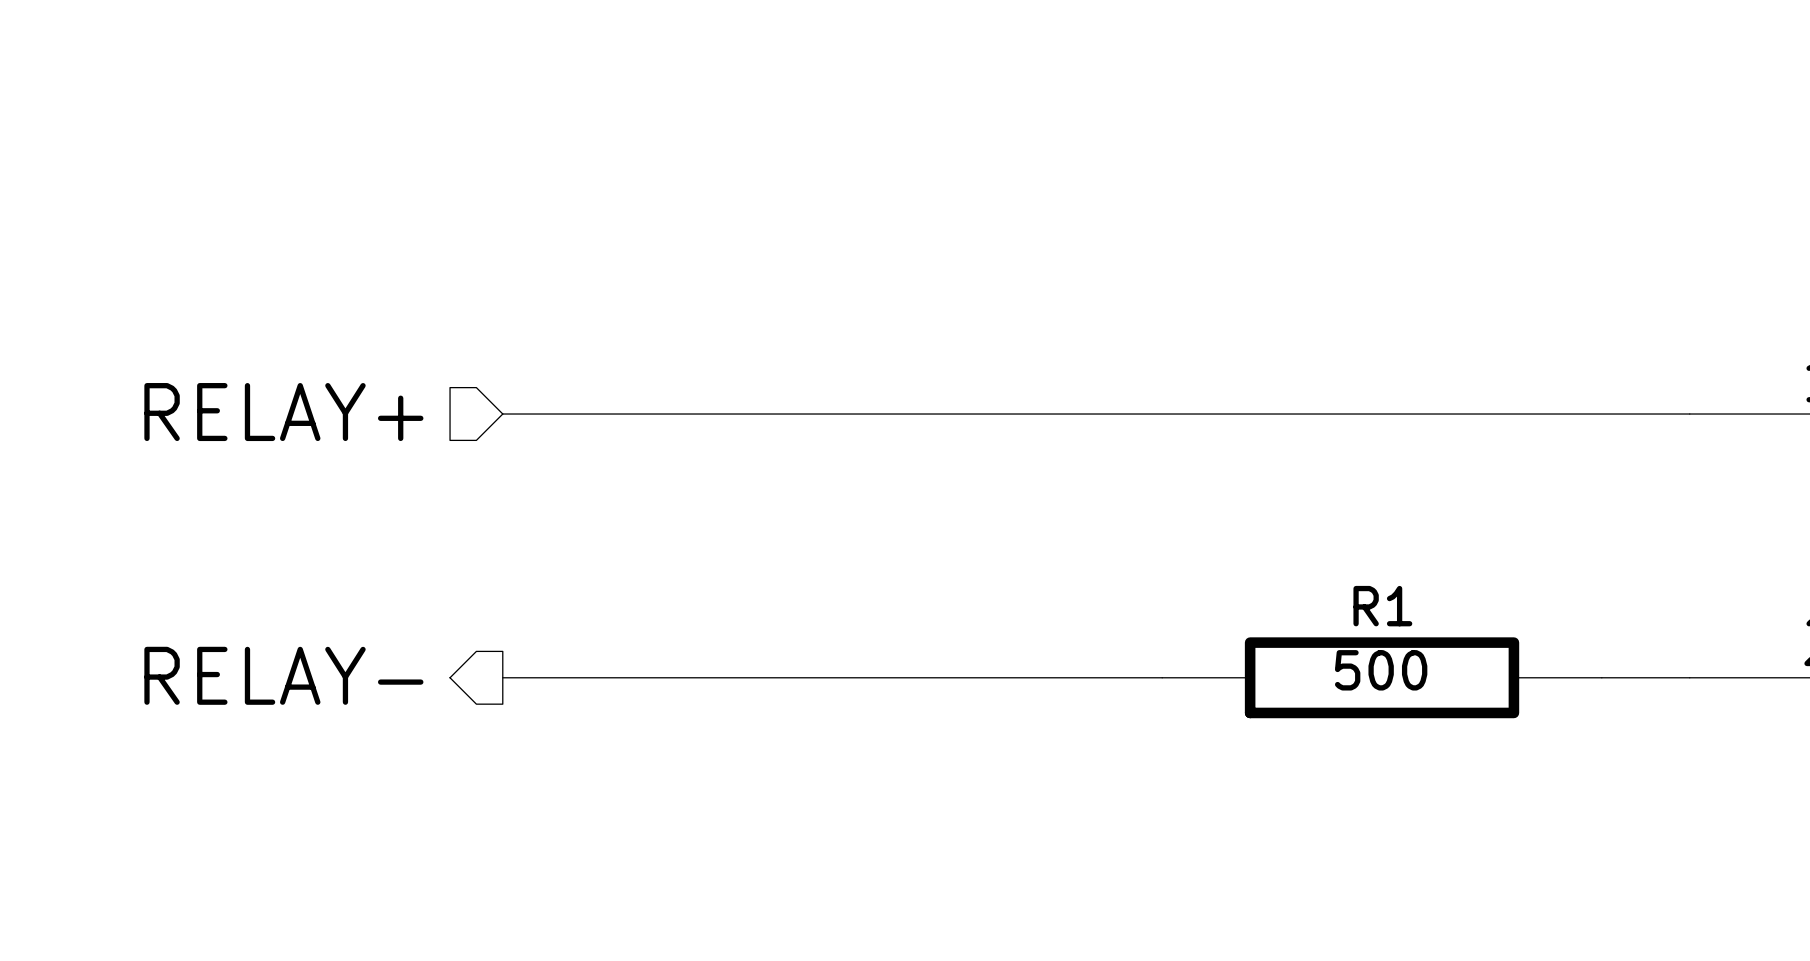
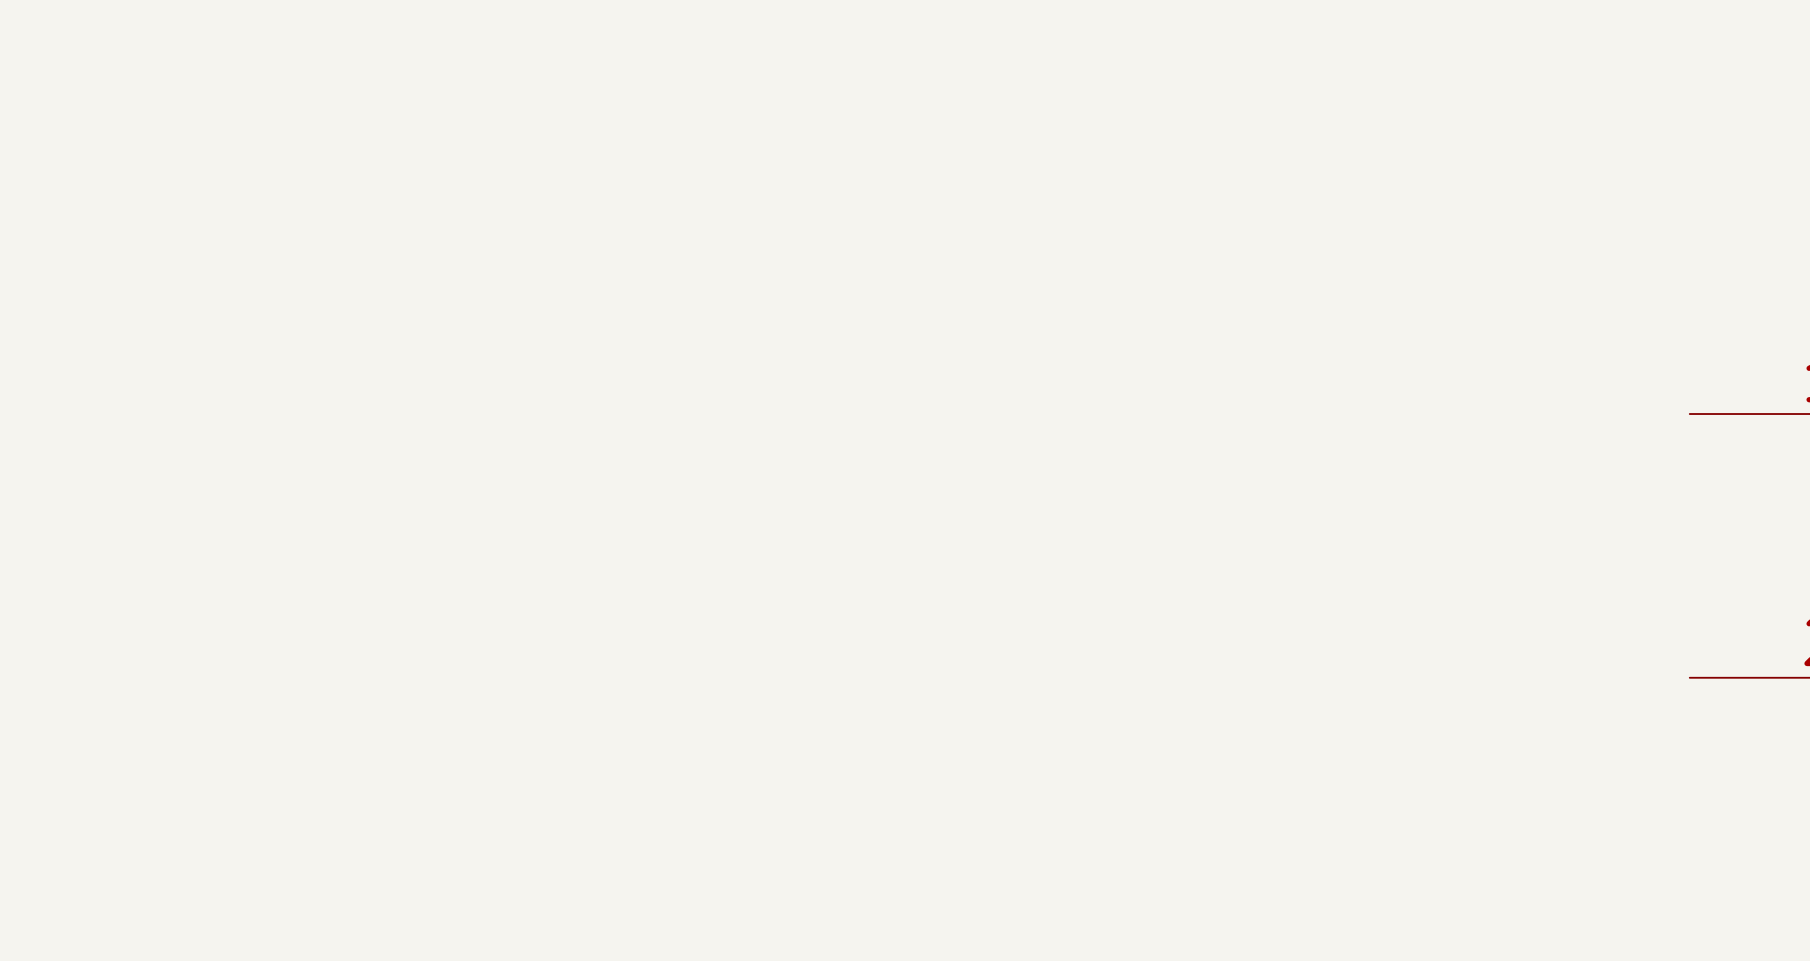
hierarchical label: RELAY+ (283, 412) -> none
wire: (502, 414) (1689, 414) -> none
hierarchical label: RELAY- (283, 675) -> none
wire: (502, 677) (1162, 677) -> none
R1: 500 (1382, 677) -> none
wire: (1601, 677) (1689, 677) -> none

